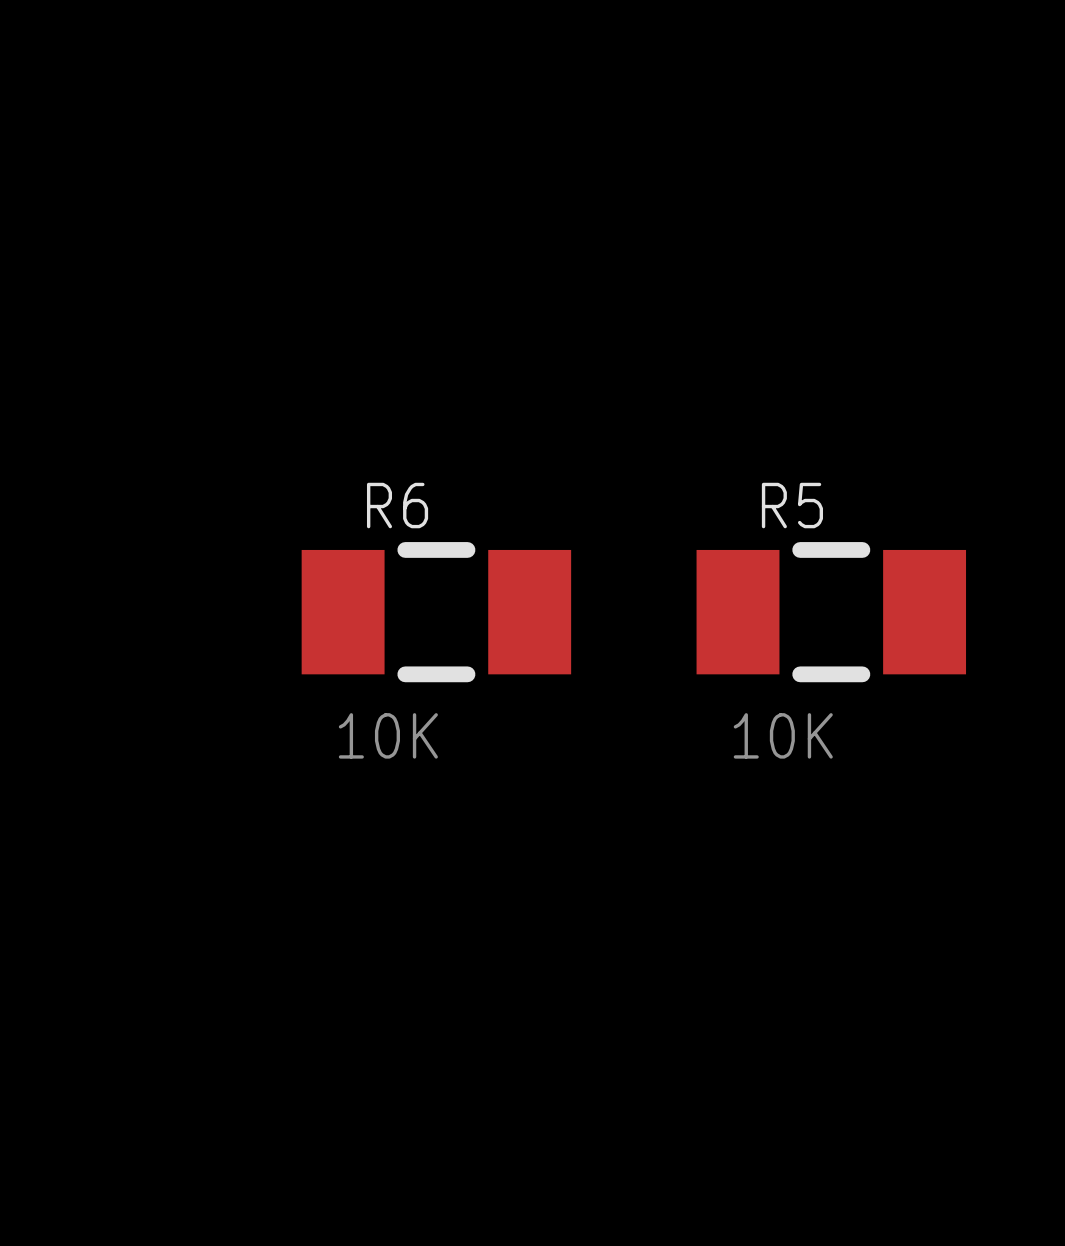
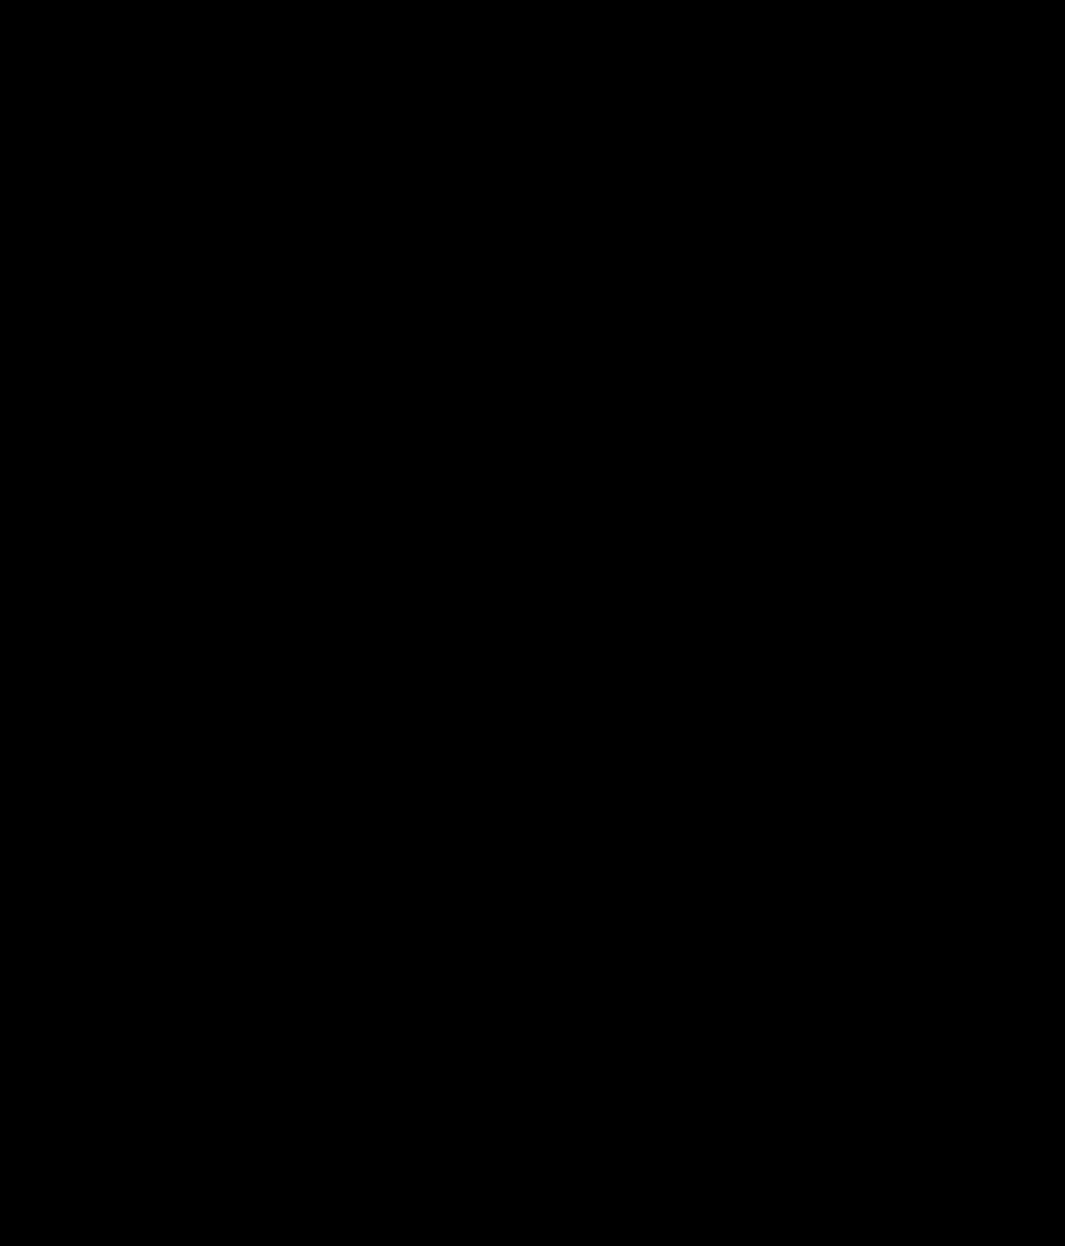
R6: 10K (436, 612) -> none
R5: 10K (831, 612) -> none

